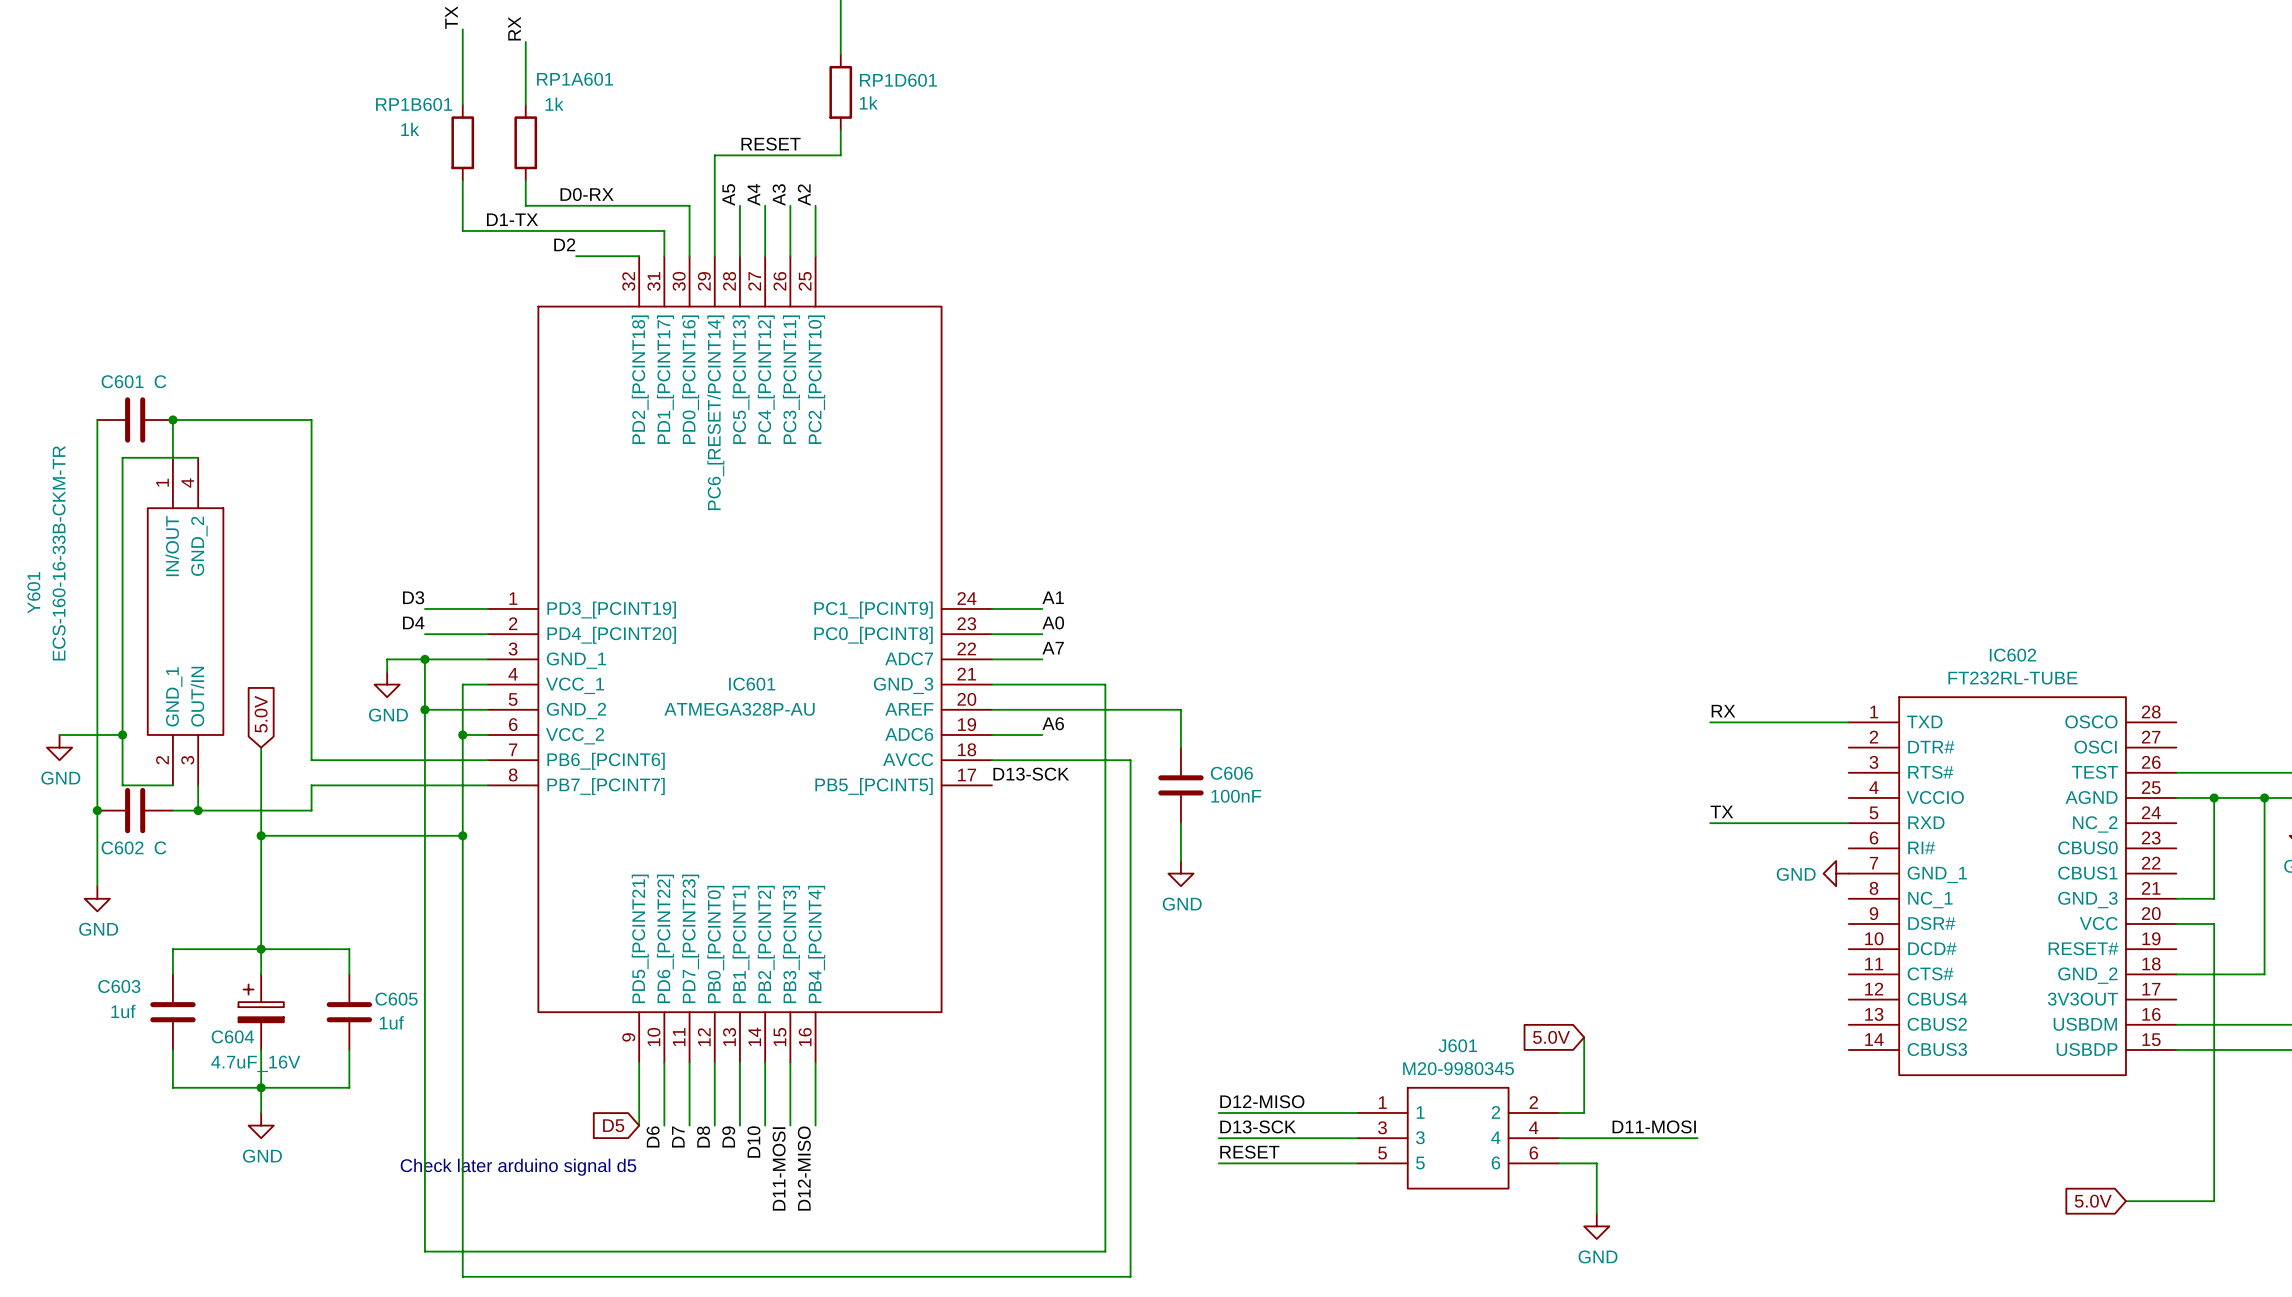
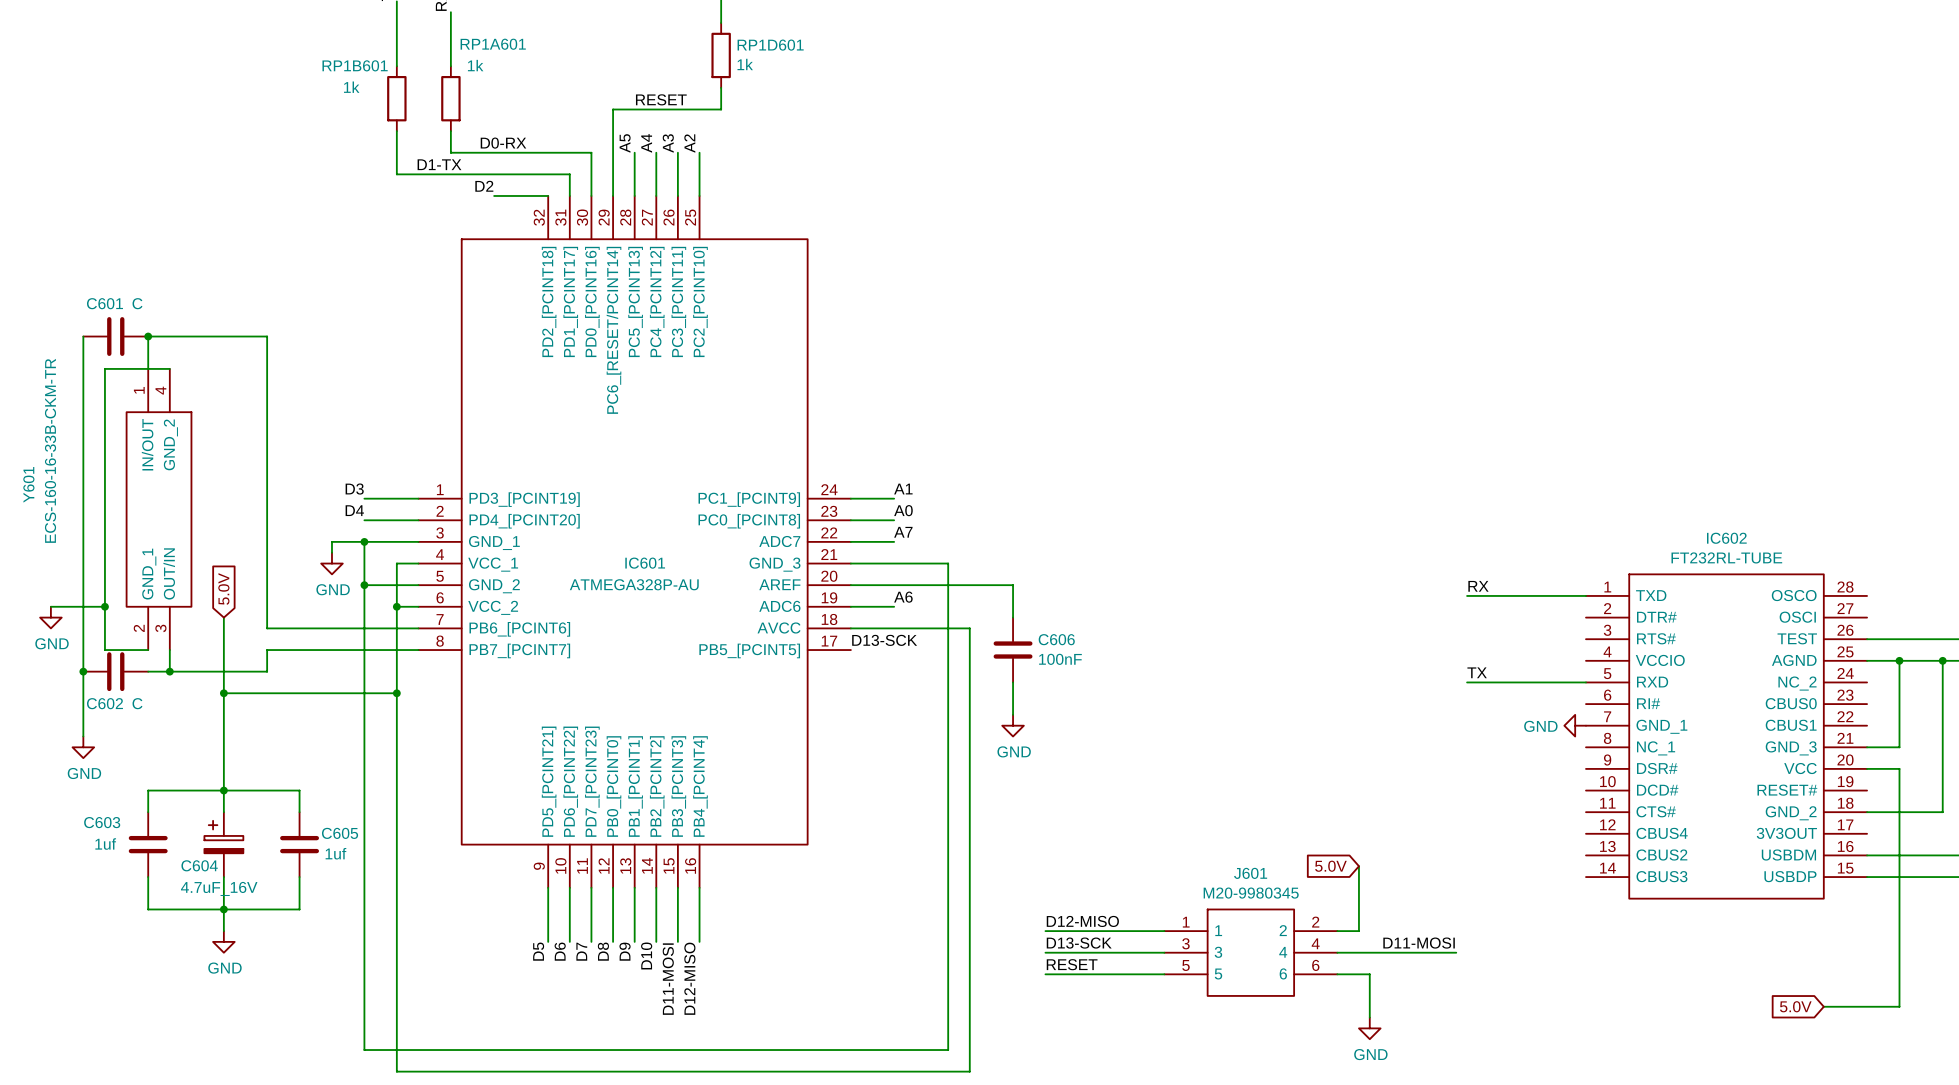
global label: D5 (613, 1125) -> none
label: none -> D5 (538, 951)
text: Check later arduino signal d5 (518, 1167) -> none

